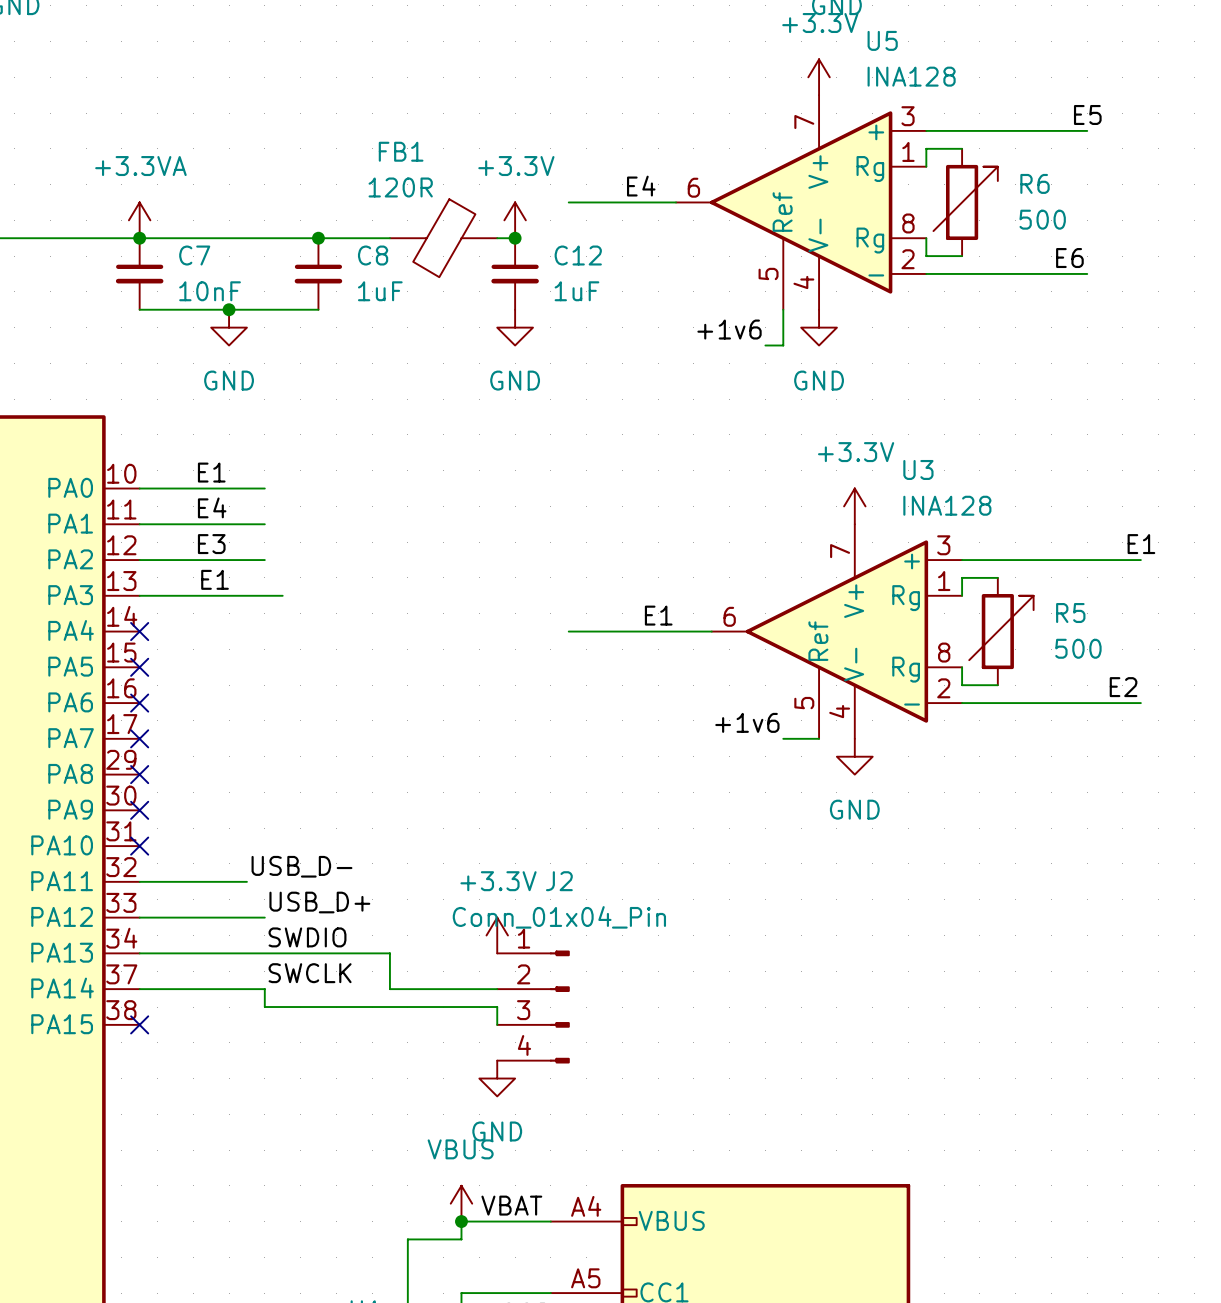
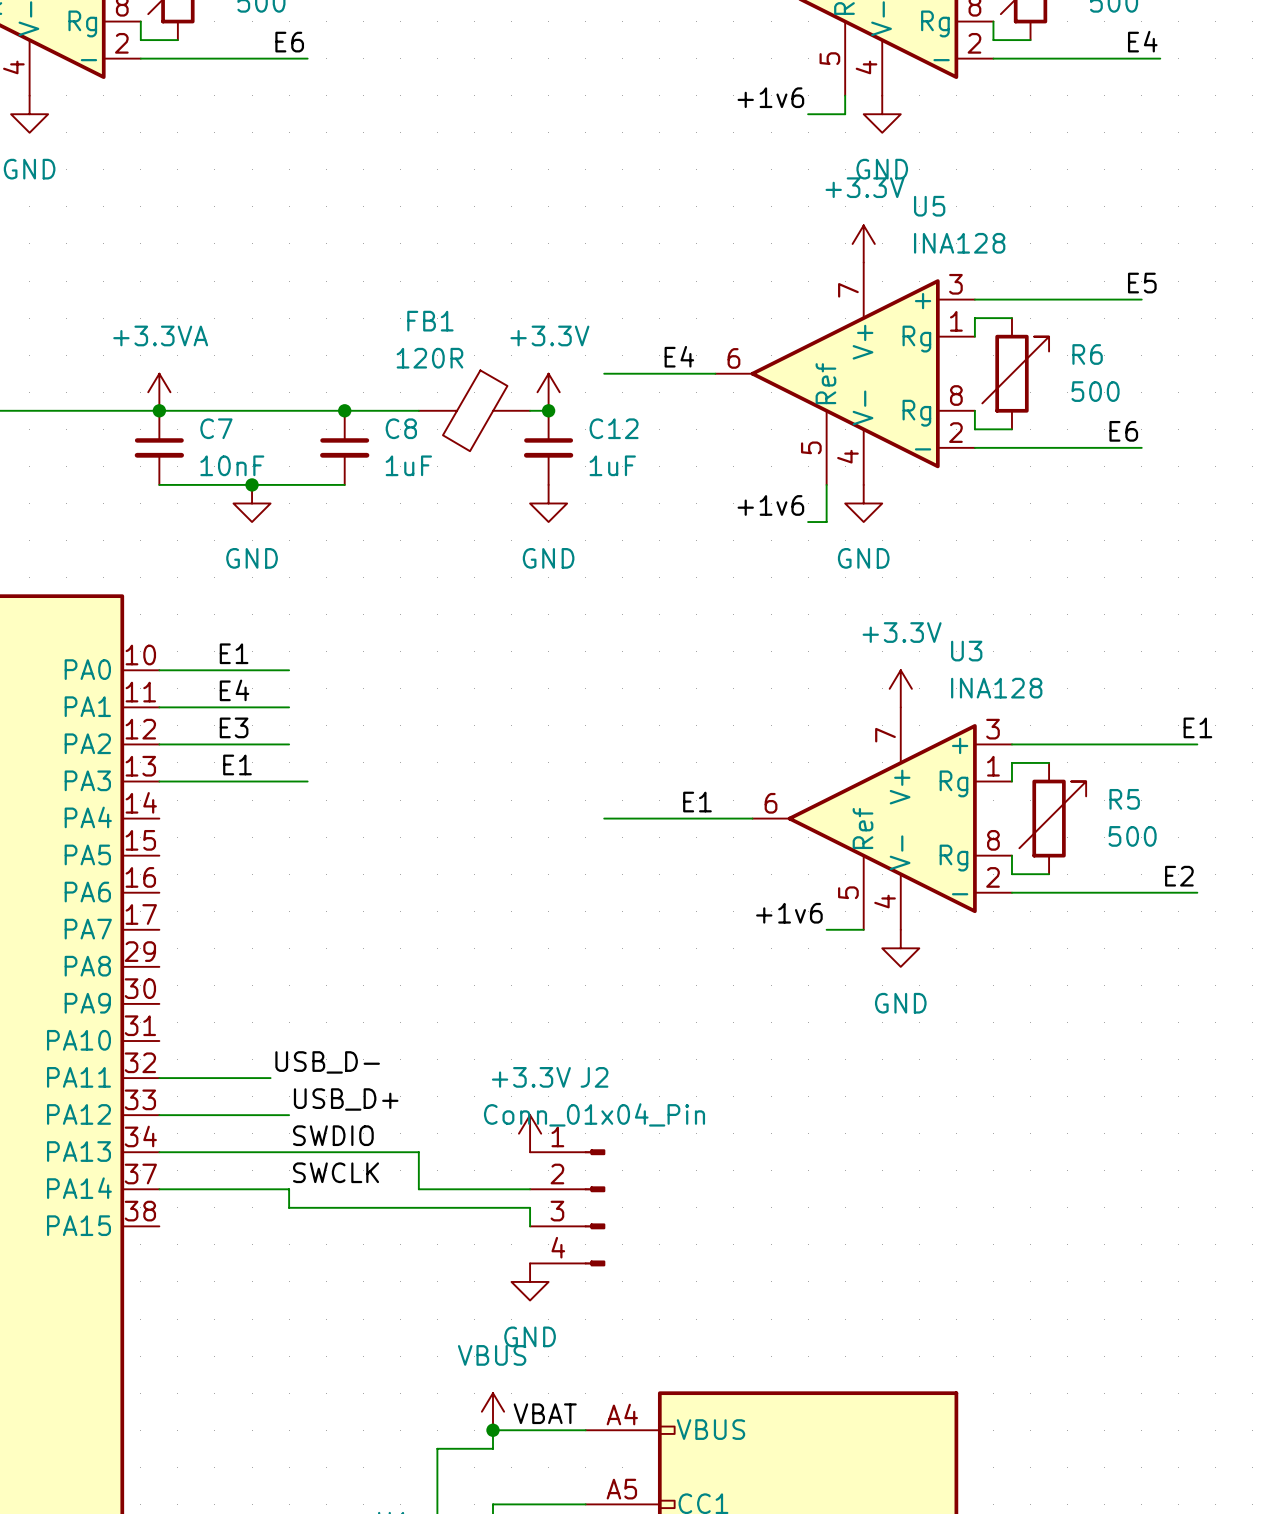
no-connect mark: (139, 631) -> none
no-connect mark: (139, 667) -> none
no-connect mark: (139, 703) -> none
no-connect mark: (139, 738) -> none
no-connect mark: (139, 774) -> none
no-connect mark: (139, 810) -> none
no-connect mark: (139, 846) -> none
no-connect mark: (139, 1024) -> none

